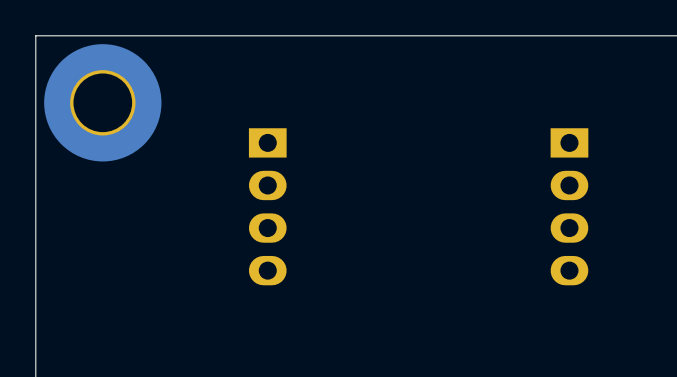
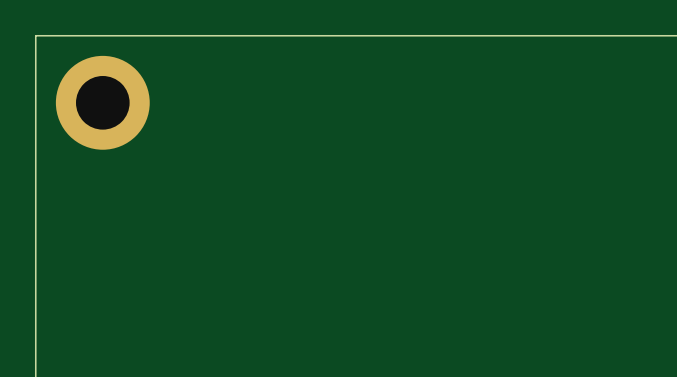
part footprint: [44, 44, 162, 162] -> [55, 55, 150, 150]
part: (267, 206) -> none
part: (569, 206) -> none

